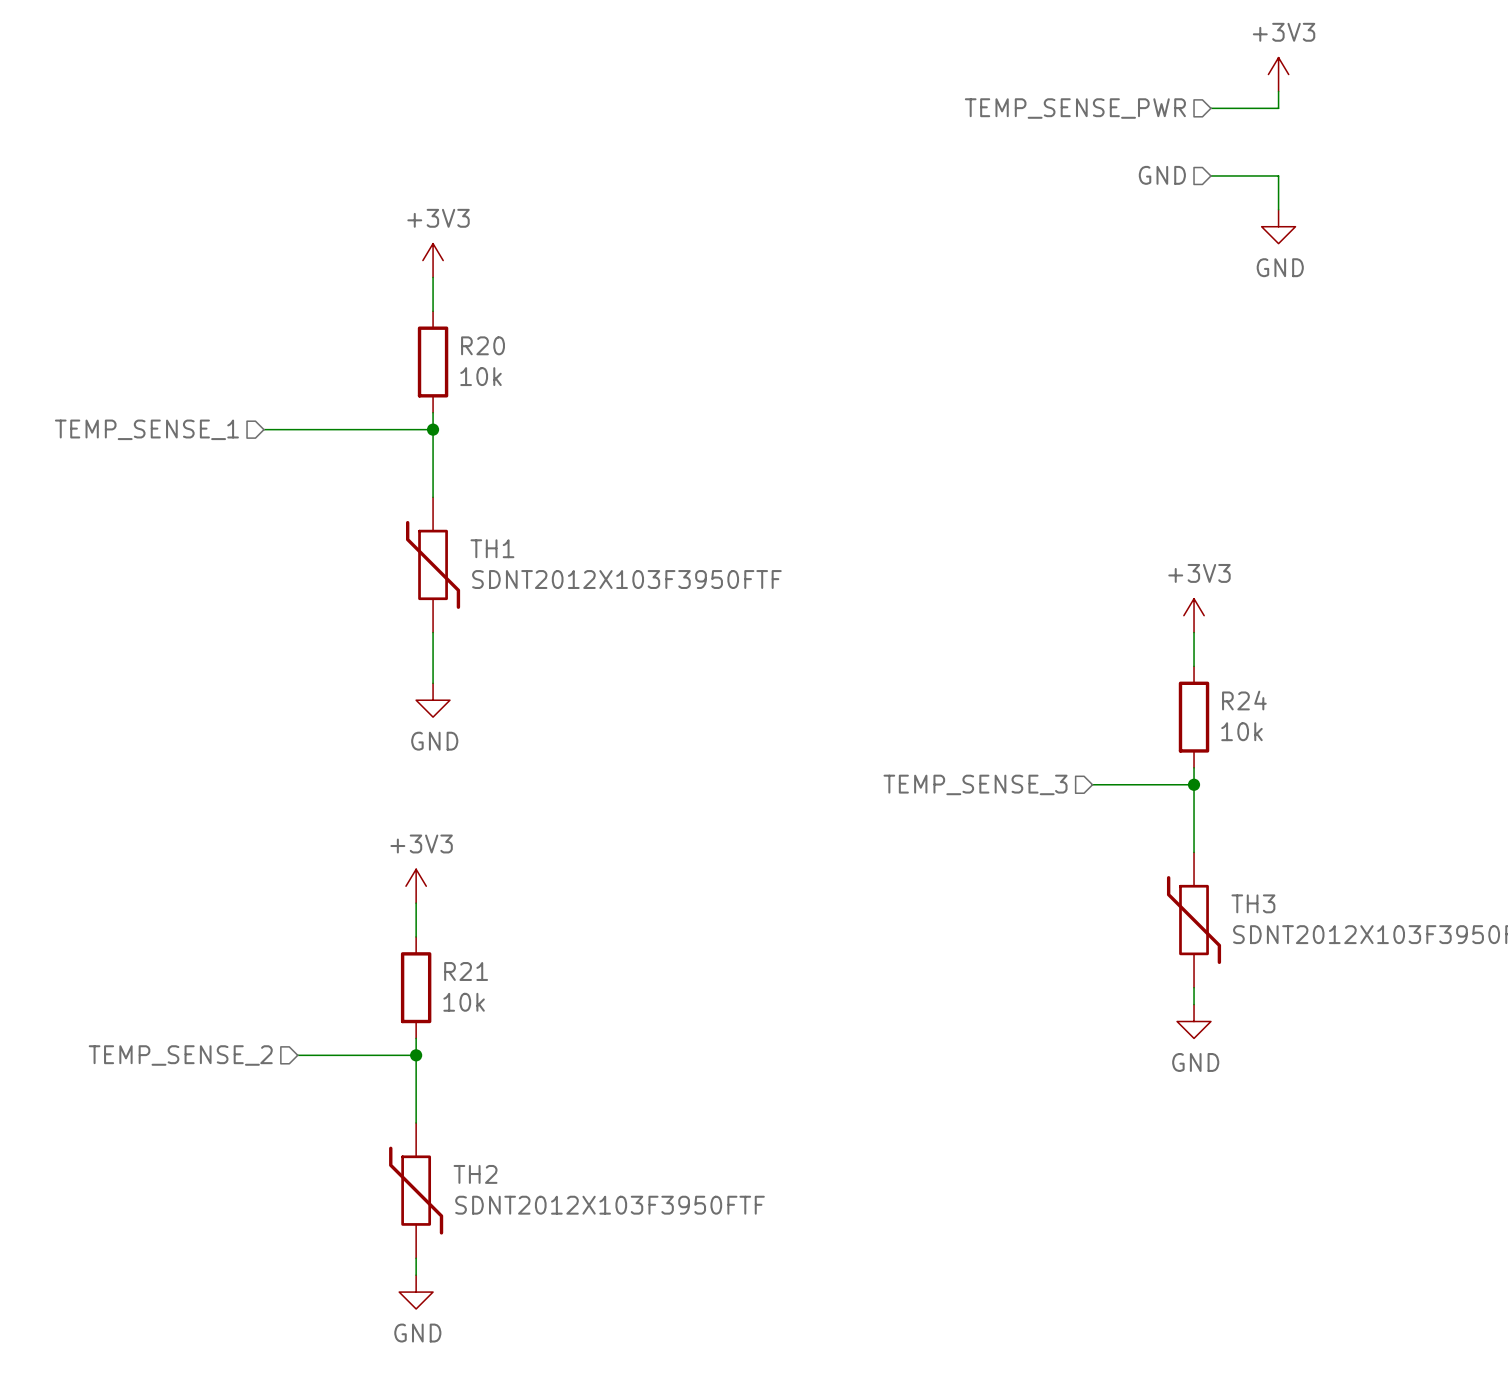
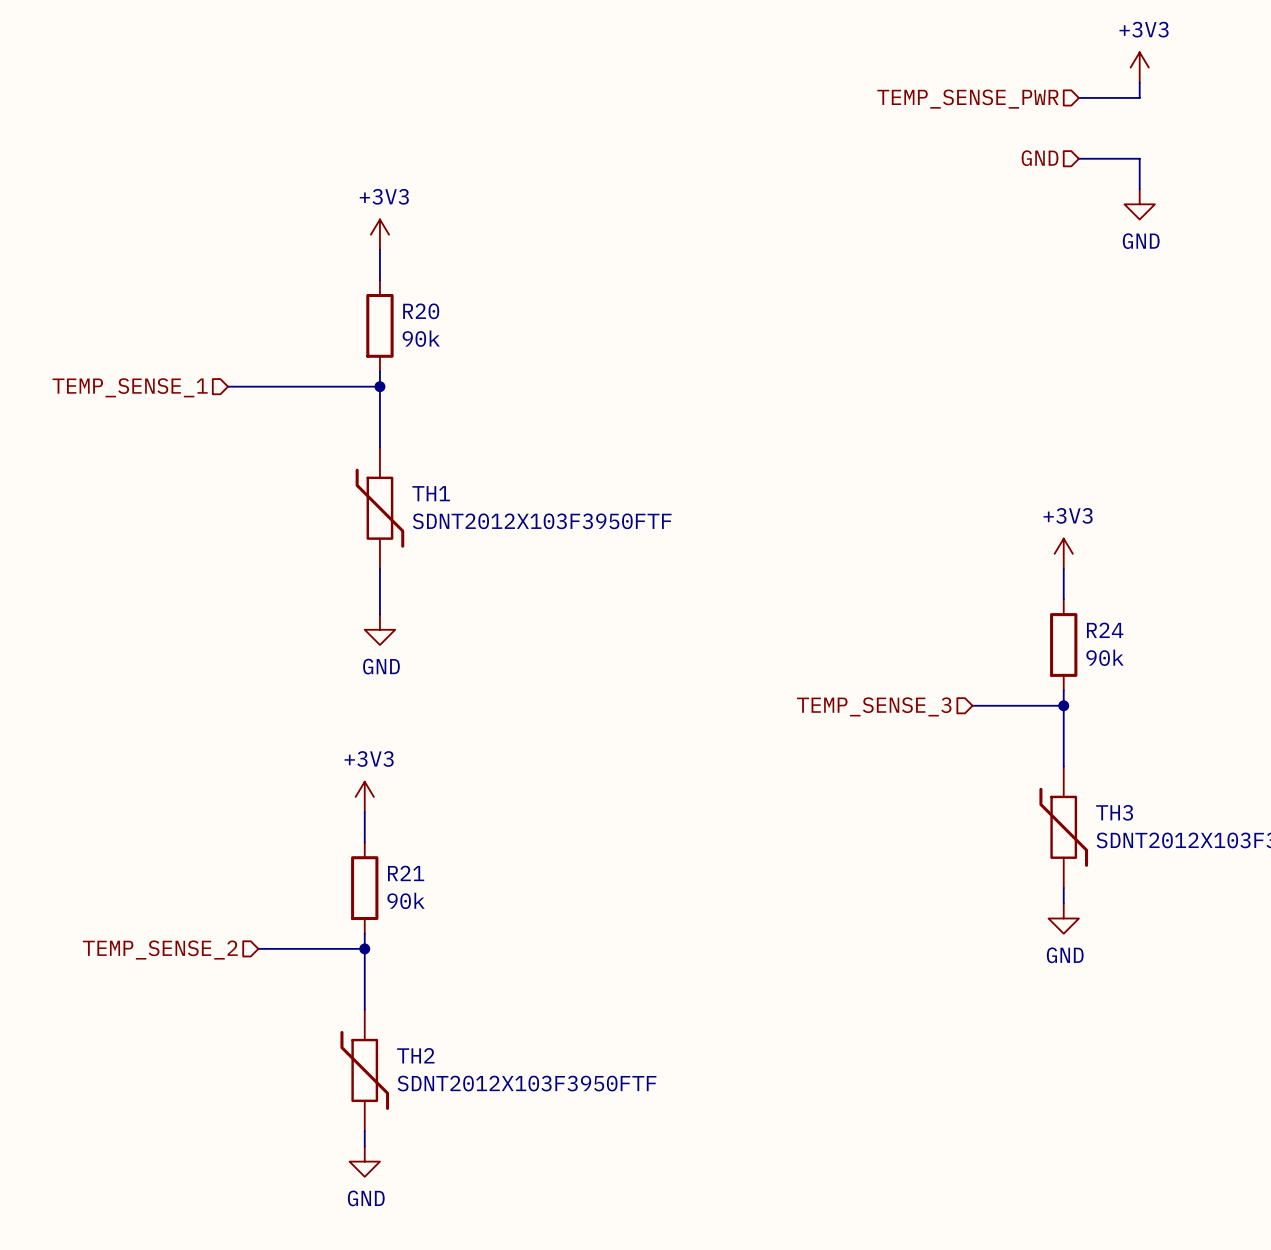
R20 value: 10k (481, 376) -> 90k (421, 338)
R24 value: 10k (1241, 731) -> 90k (1105, 657)
R21 value: 10k (464, 1002) -> 90k (406, 900)

